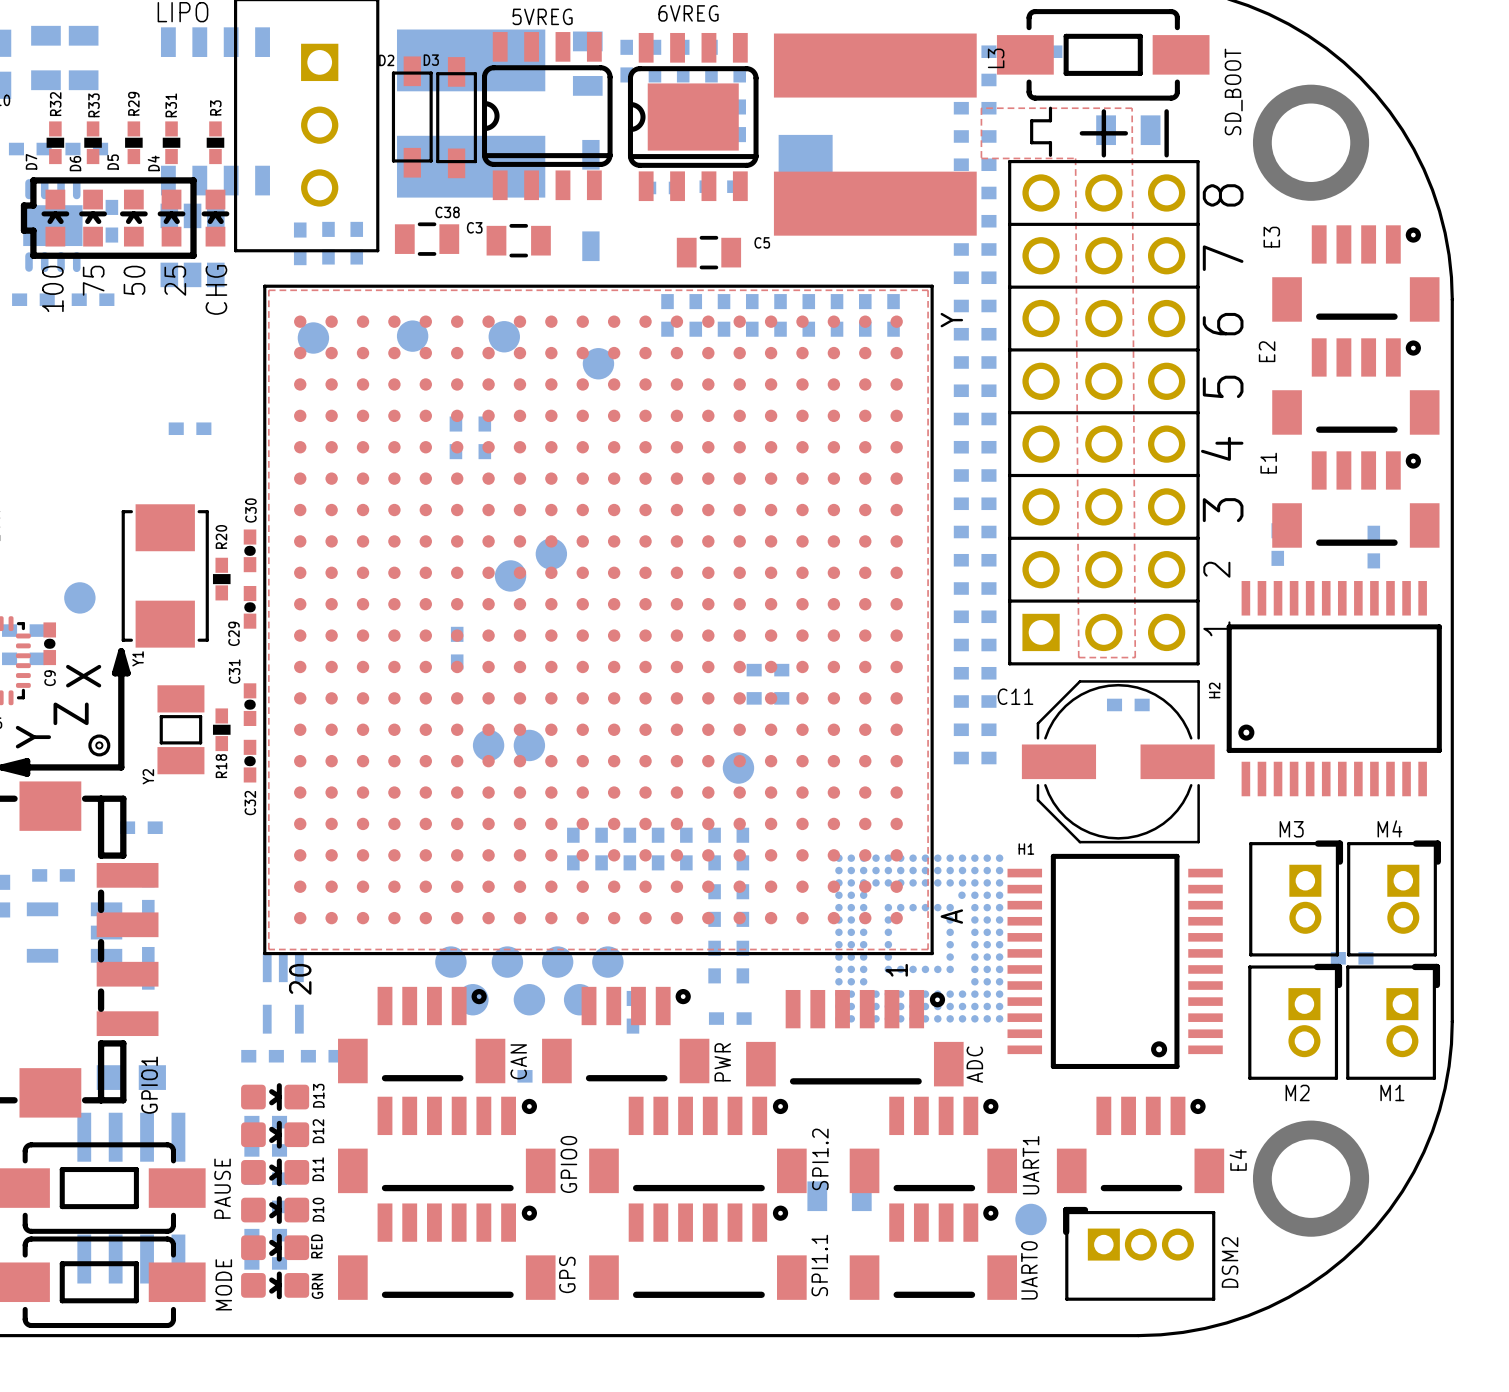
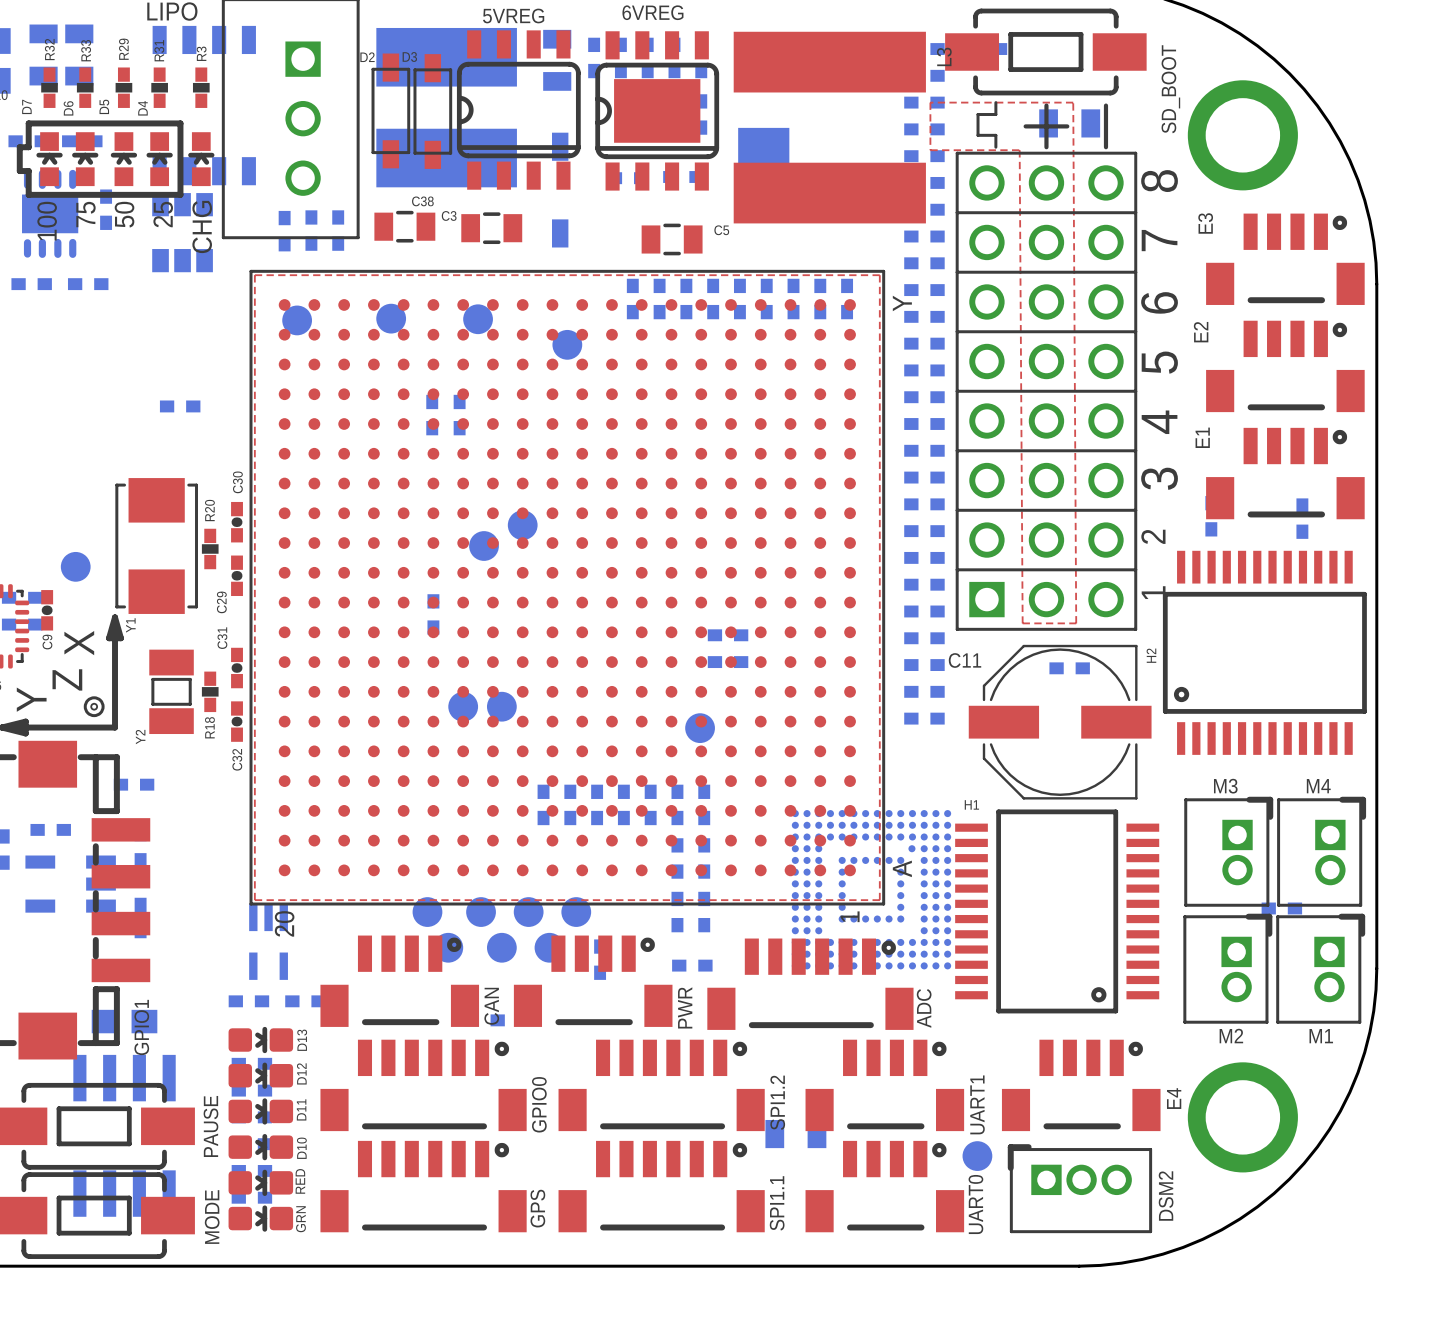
R32 position: (55, 142) -> (49, 87)
R33 position: (93, 142) -> (85, 87)
R29 position: (133, 142) -> (123, 87)
R31 position: (171, 142) -> (159, 87)
R3 position: (215, 142) -> (201, 87)
D7 position: (55, 218) -> (49, 159)
D6 position: (93, 218) -> (85, 159)
drawing position: (108, 218) -> (100, 159)
D5 position: (133, 218) -> (123, 159)
D4 position: (171, 218) -> (159, 159)
CHG position: (215, 218) -> (201, 159)

